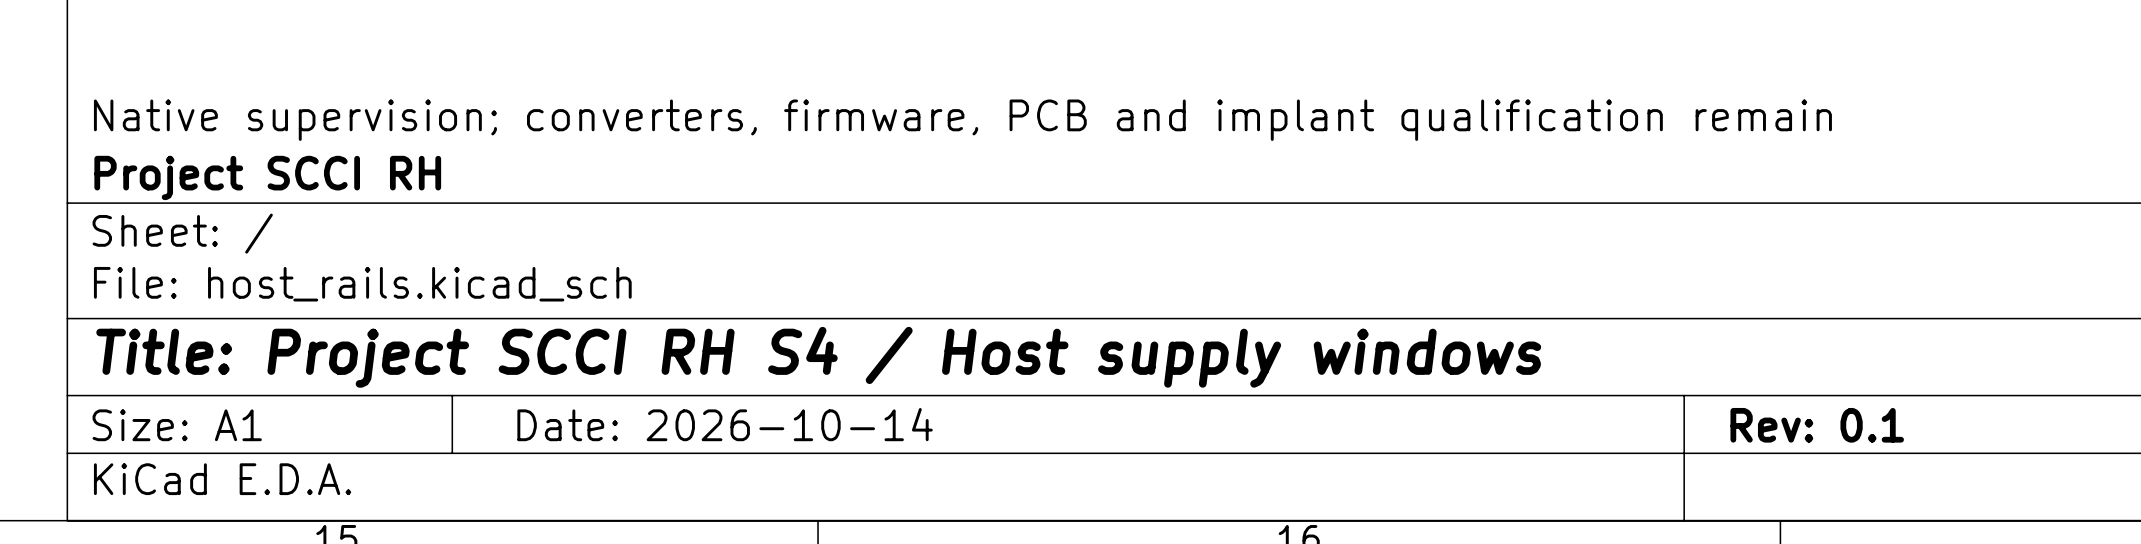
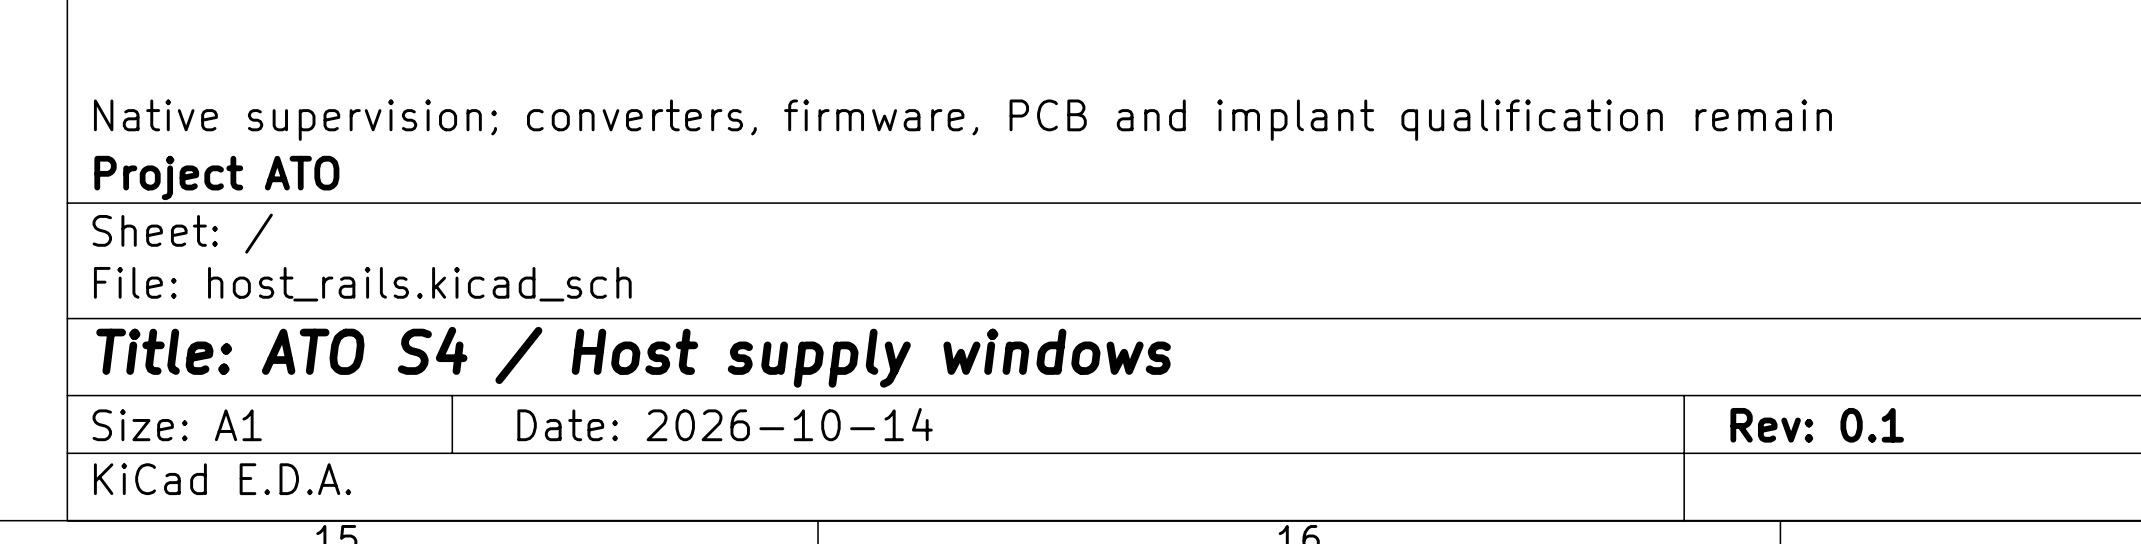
title block: Project SCCI RH (267, 177) -> Project ATO (216, 177)
title block: Title: Project SCCI RH S4 / Host supply windows (818, 357) -> Title: ATO S4 / Host supply windows (633, 357)

